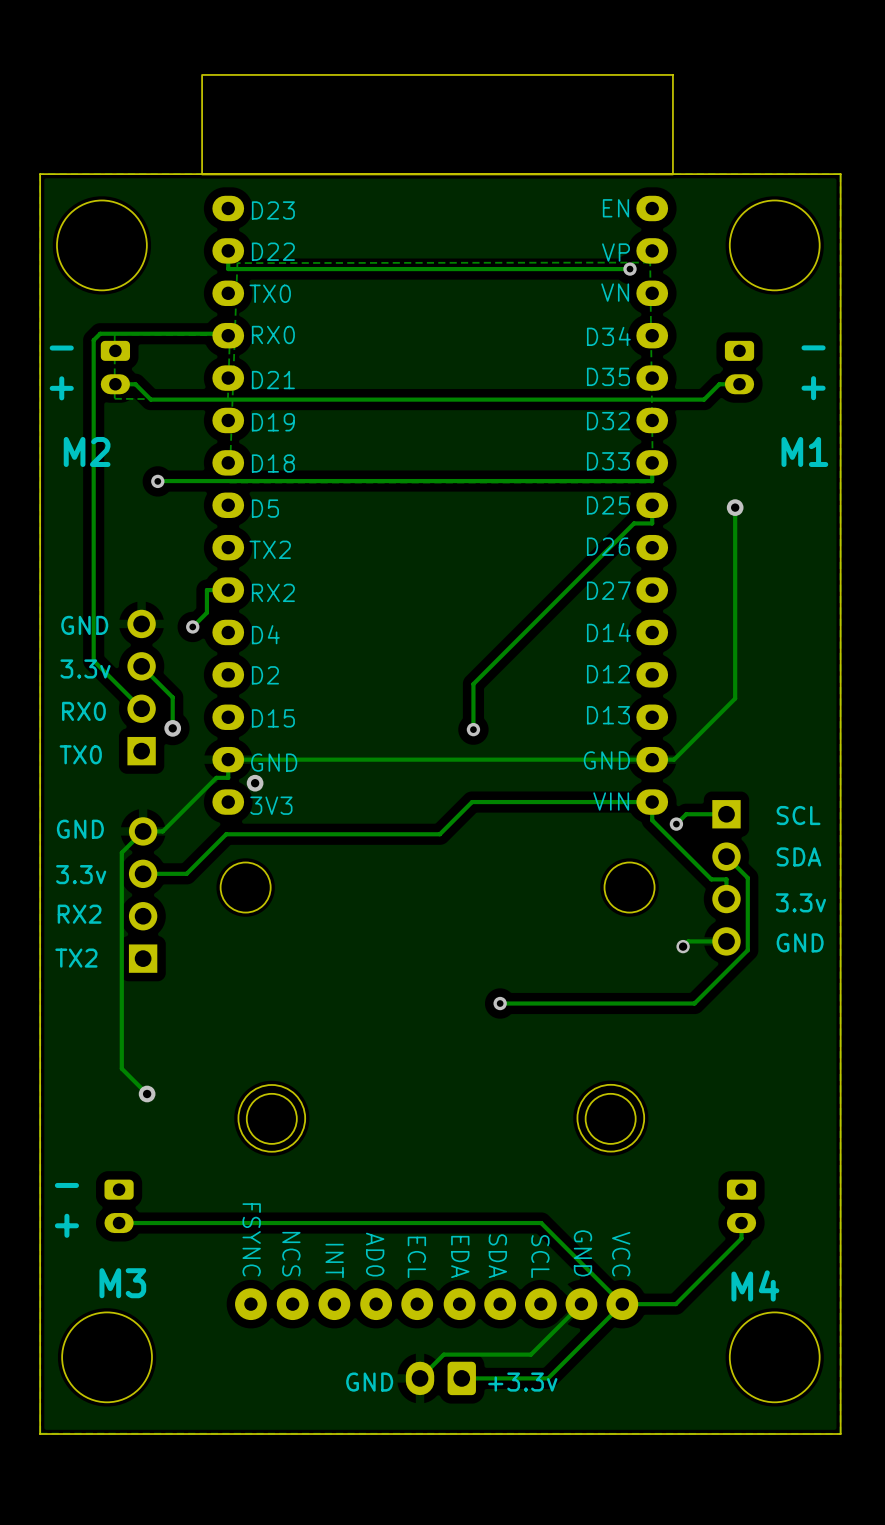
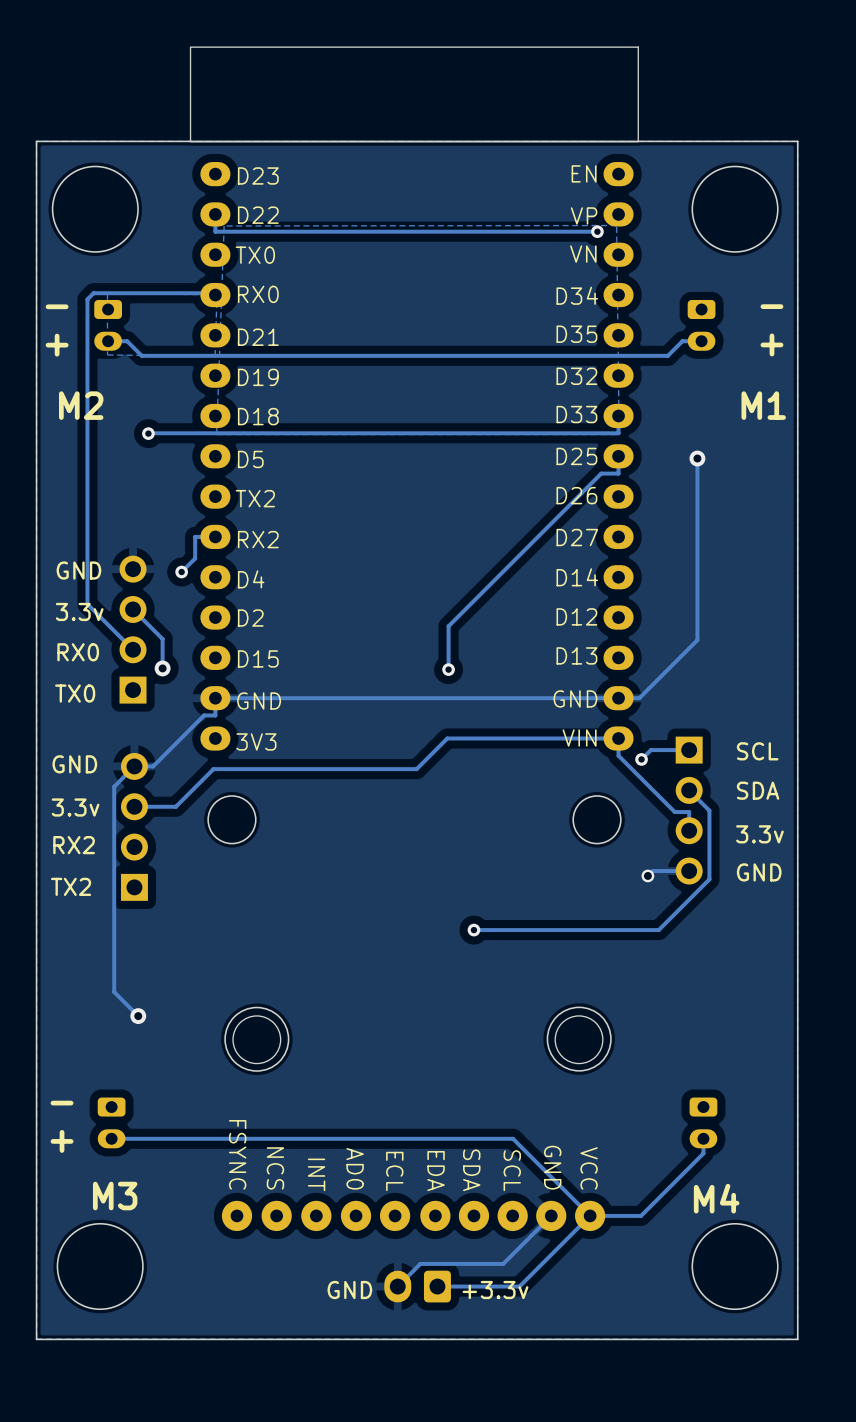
via: (255, 783) -> none

